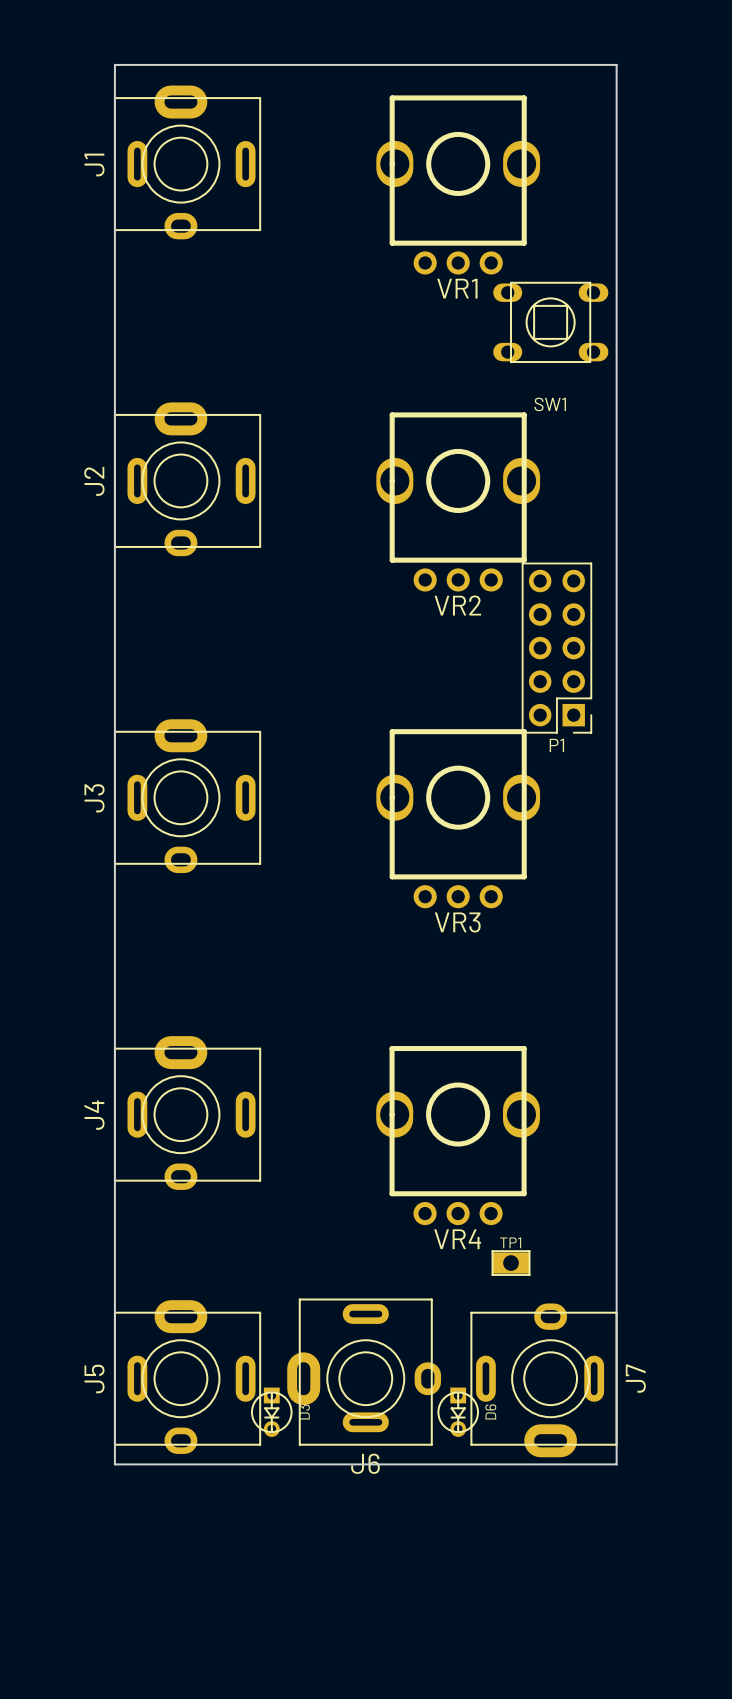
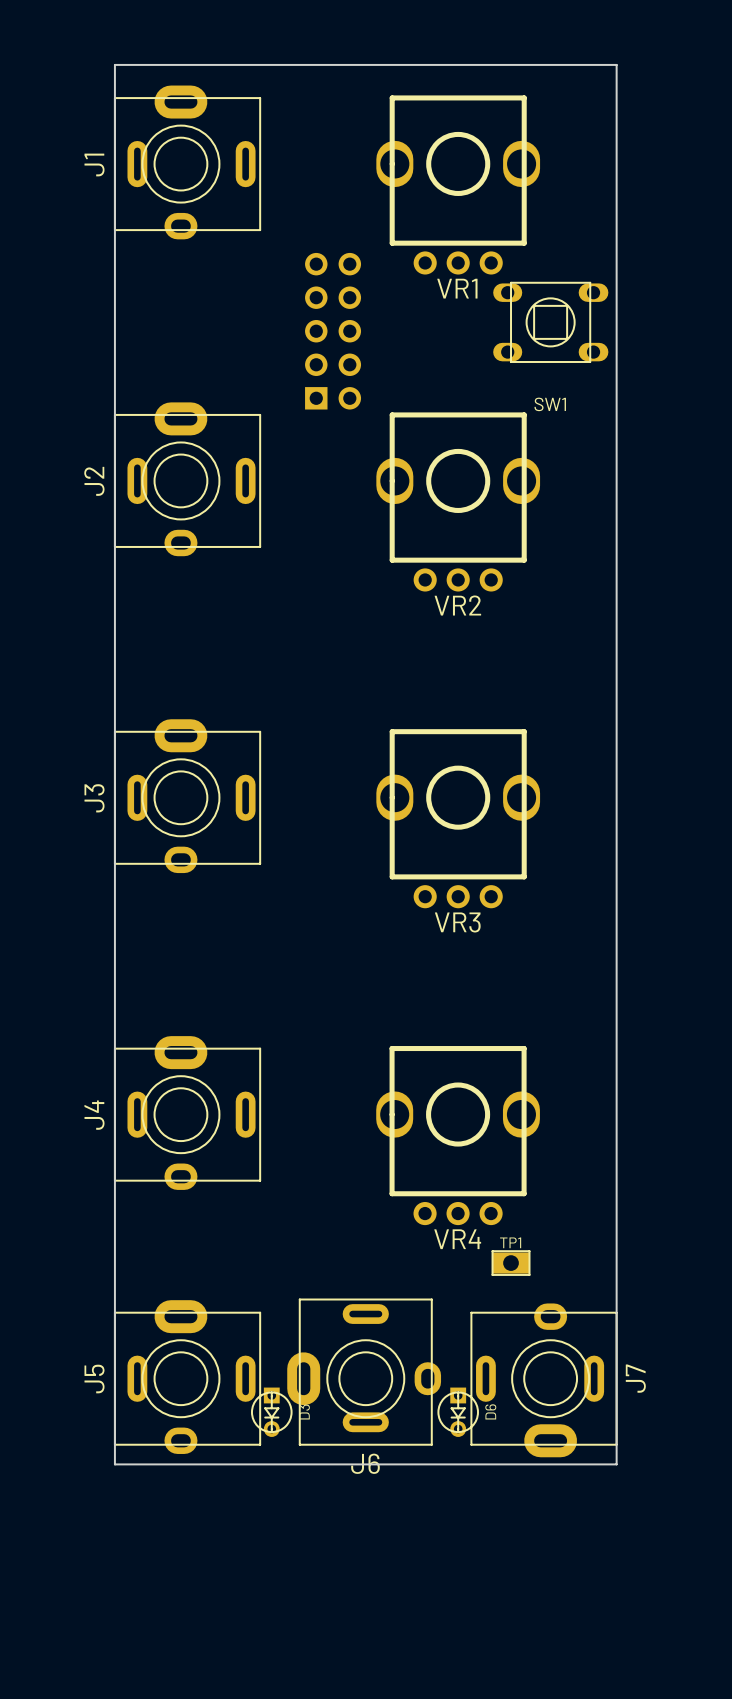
part: none -> (333, 331)
P1: (556, 648) -> none

